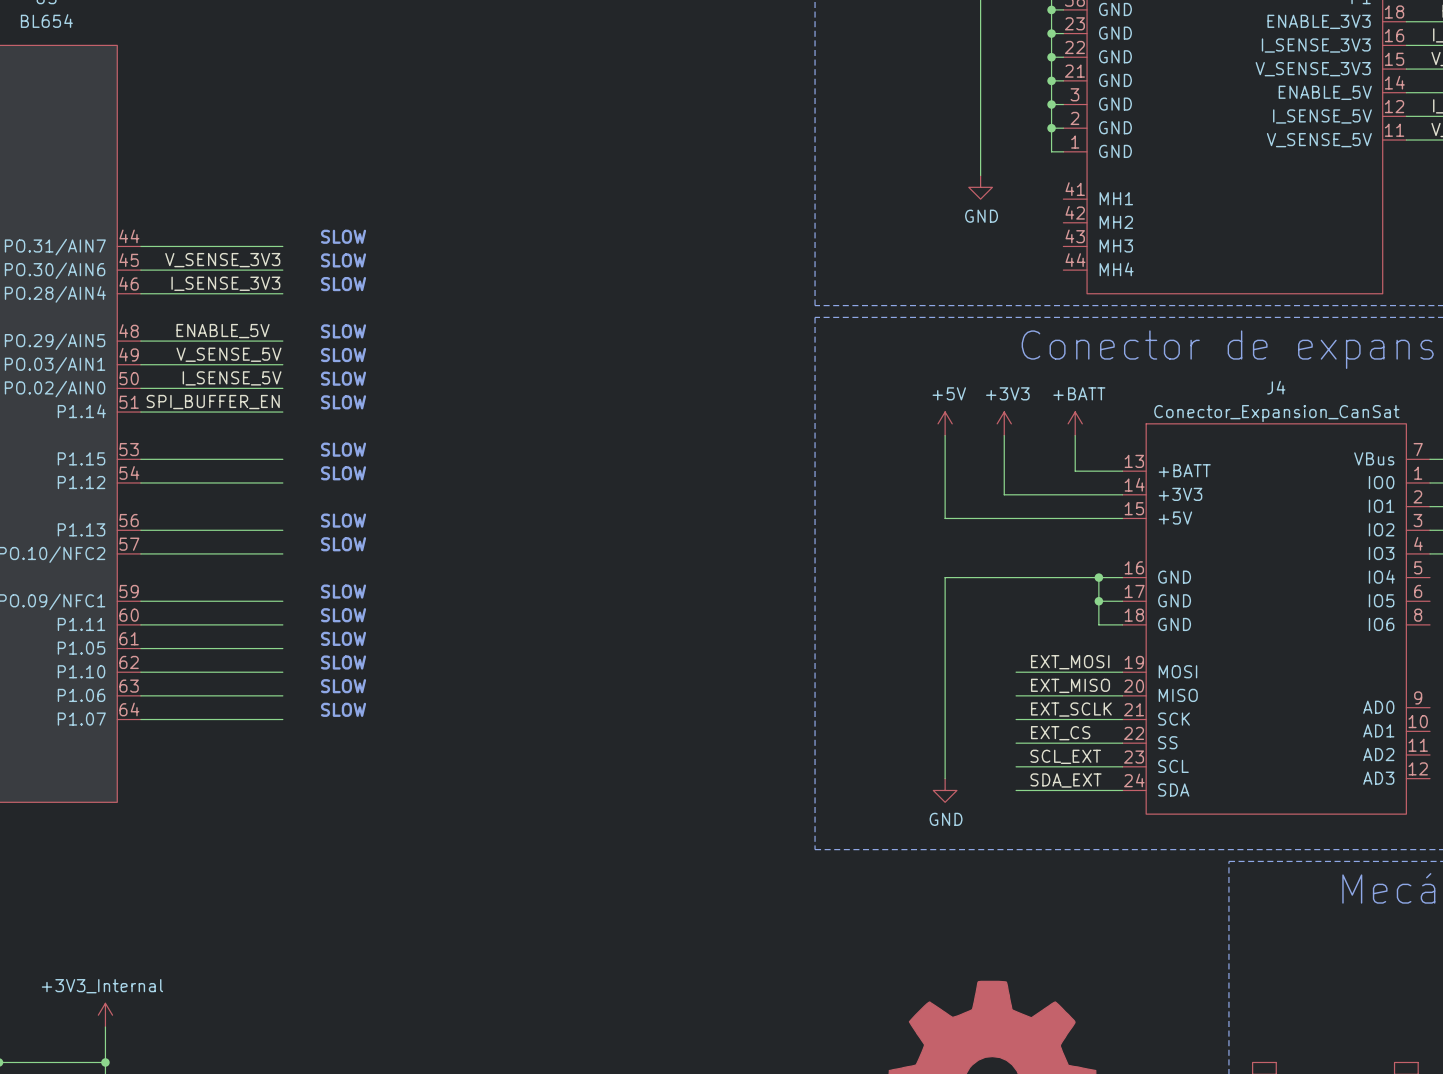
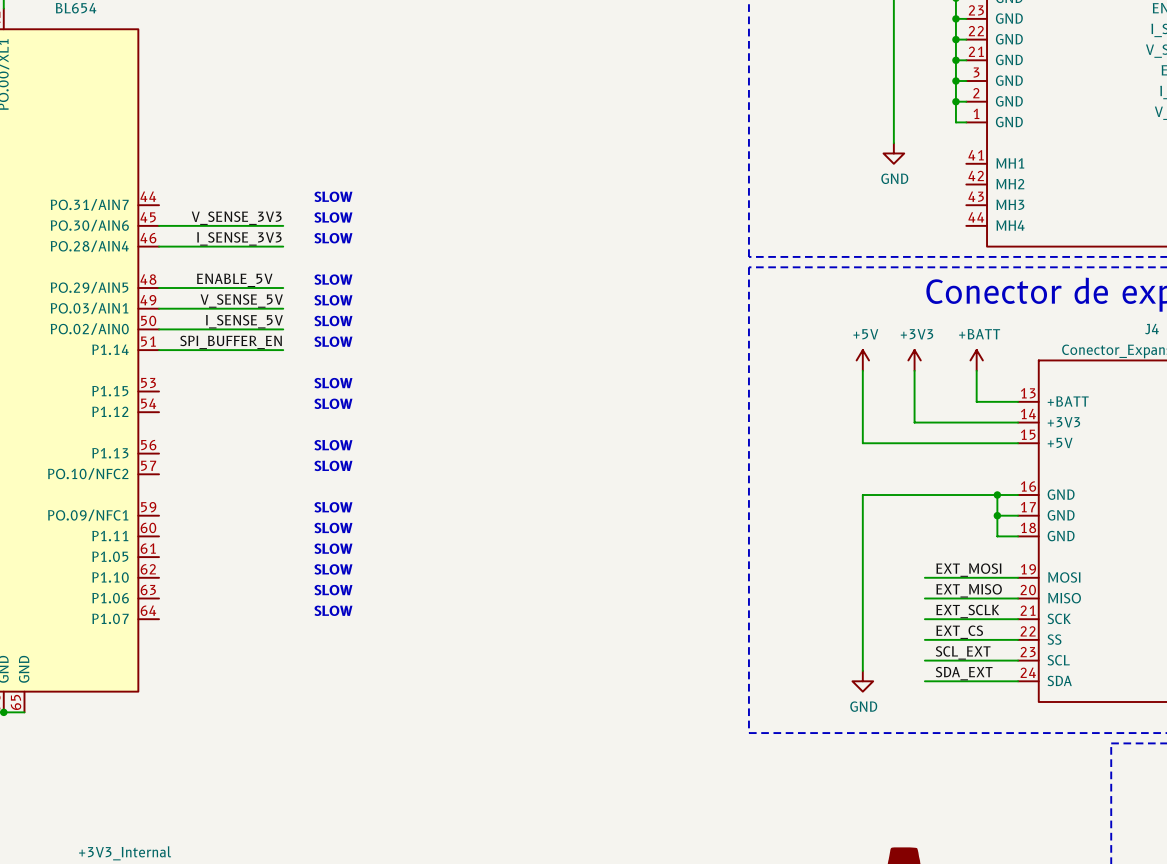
wire: (140, 246) (282, 246) -> none
wire: (140, 459) (282, 459) -> none
wire: (140, 482) (282, 482) -> none
wire: (140, 530) (282, 530) -> none
wire: (140, 553) (282, 553) -> none
wire: (140, 601) (282, 601) -> none
wire: (140, 624) (282, 624) -> none
wire: (140, 648) (282, 648) -> none
wire: (140, 672) (282, 672) -> none
wire: (140, 695) (282, 695) -> none
wire: (140, 719) (282, 719) -> none

